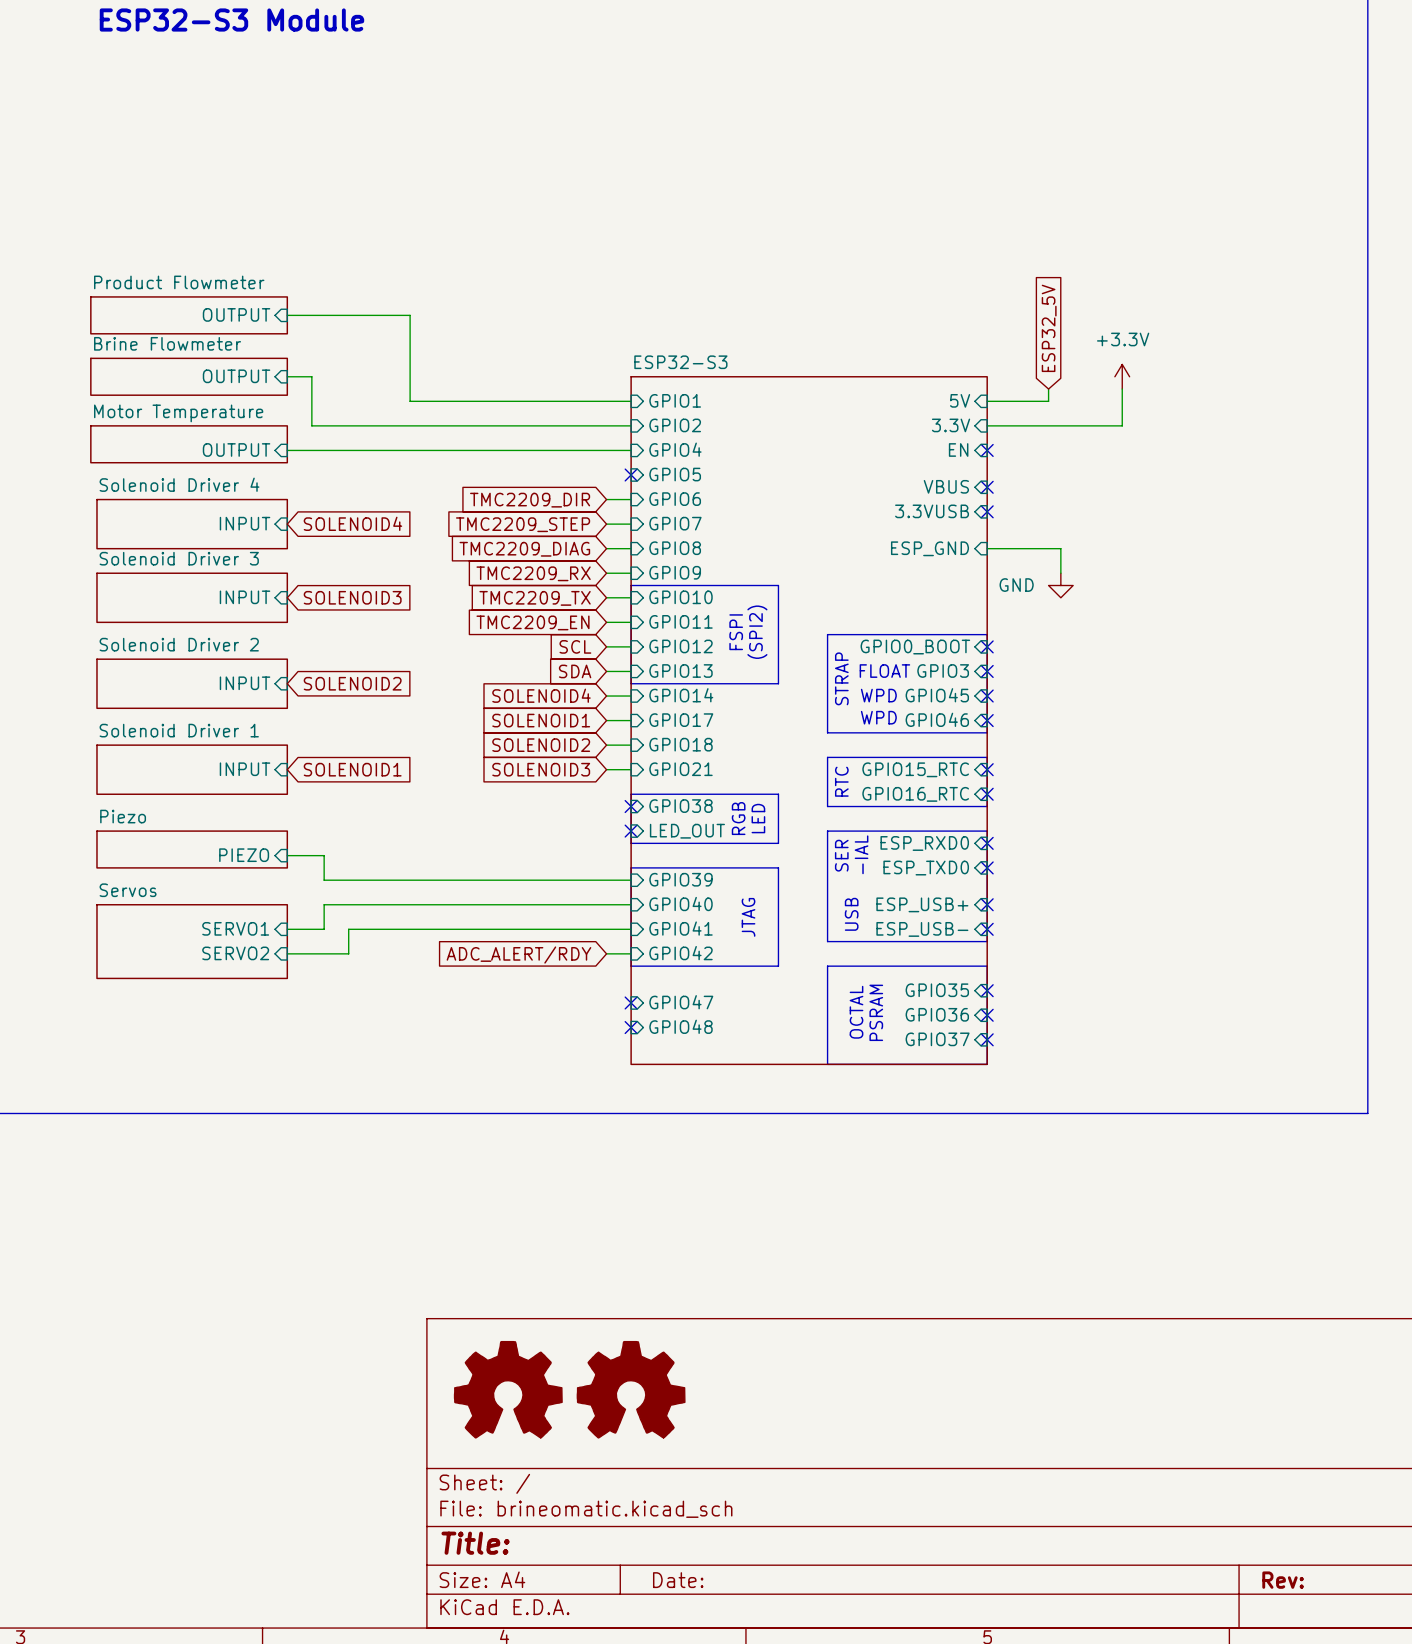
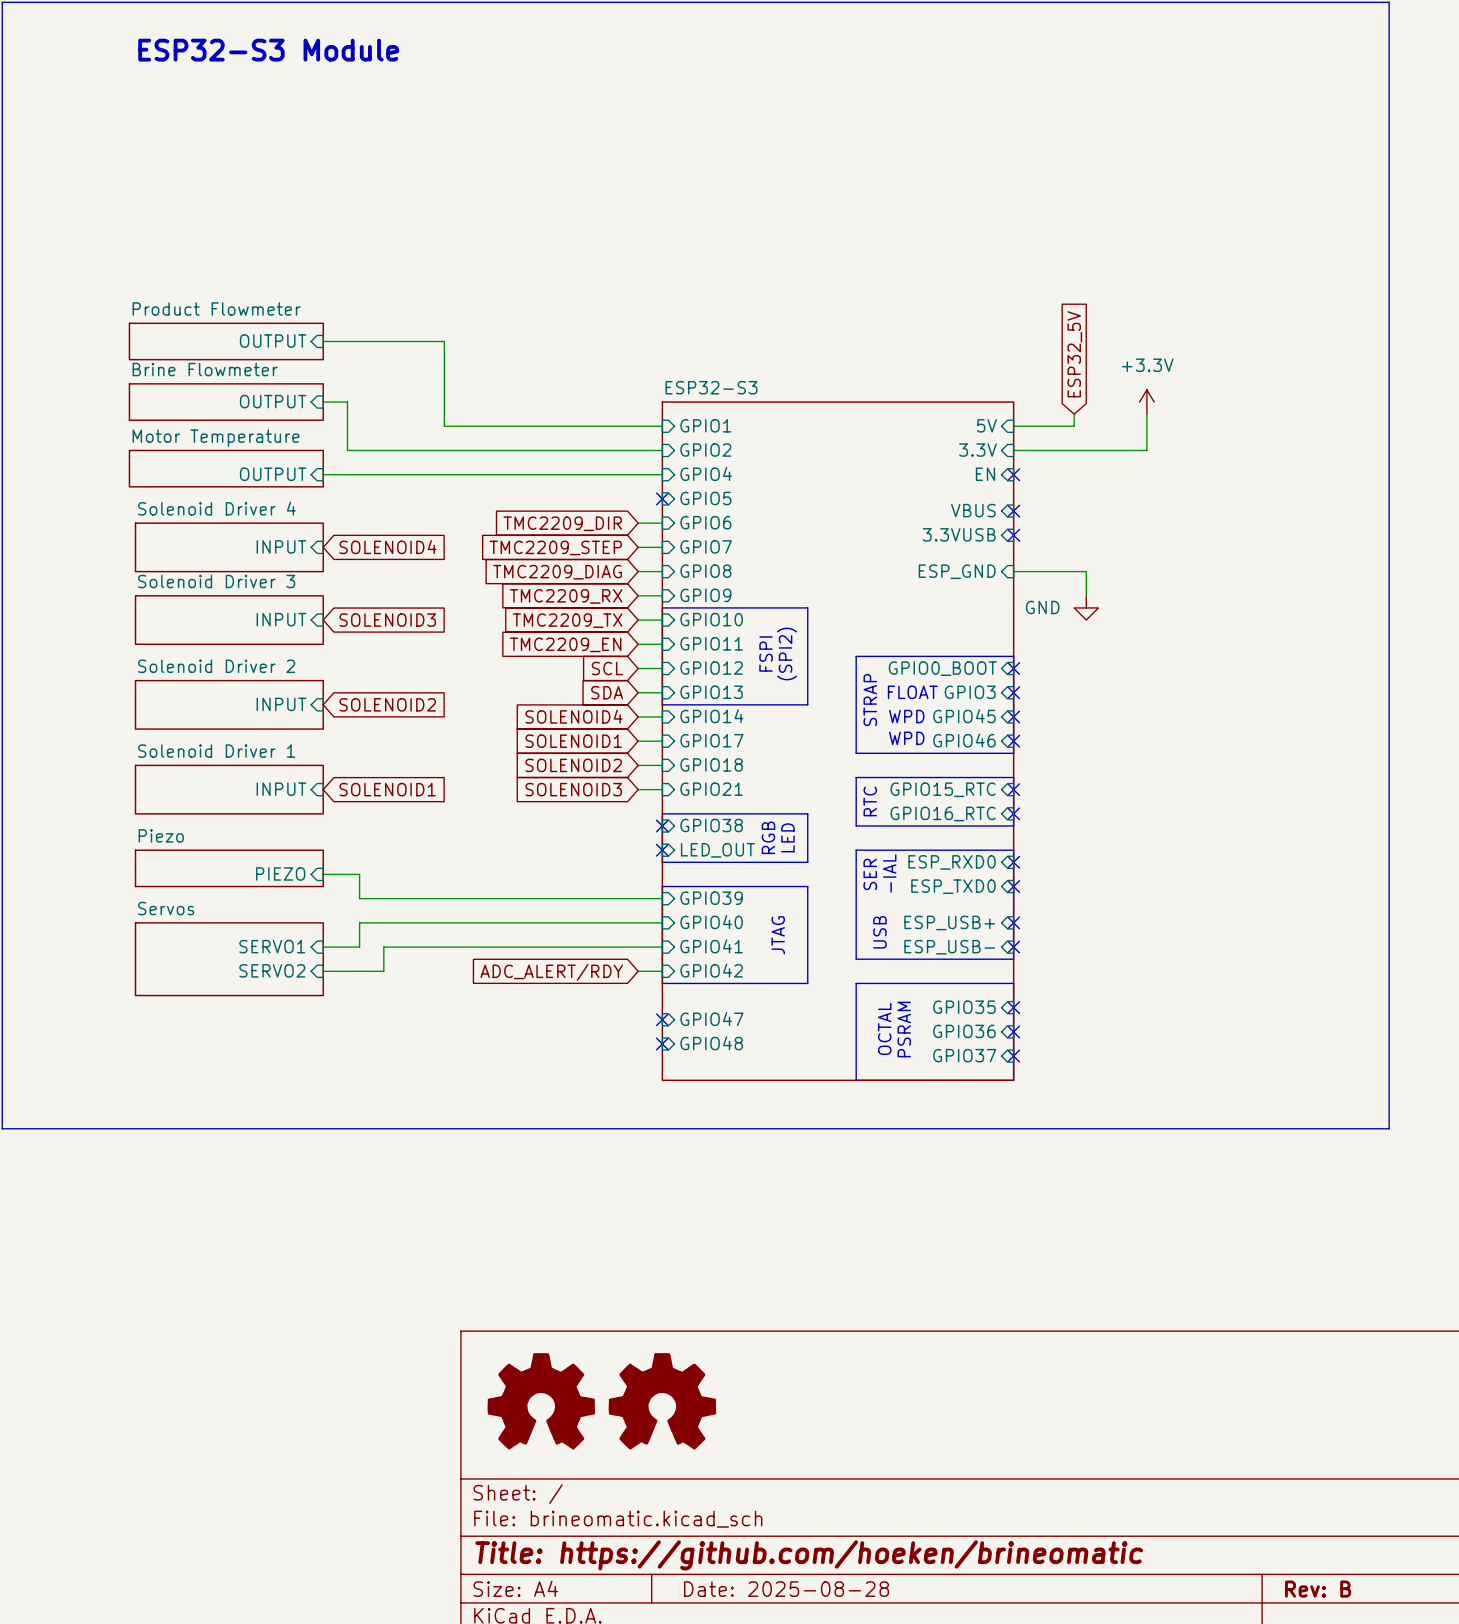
title block: Title: (475, 1543) -> Title: https://github.com/hoeken/brineomatic (809, 1555)
title block: Date: (678, 1580) -> Date: 2025-08-28 (786, 1589)
title block: Rev: (1283, 1580) -> Rev: B (1318, 1589)

